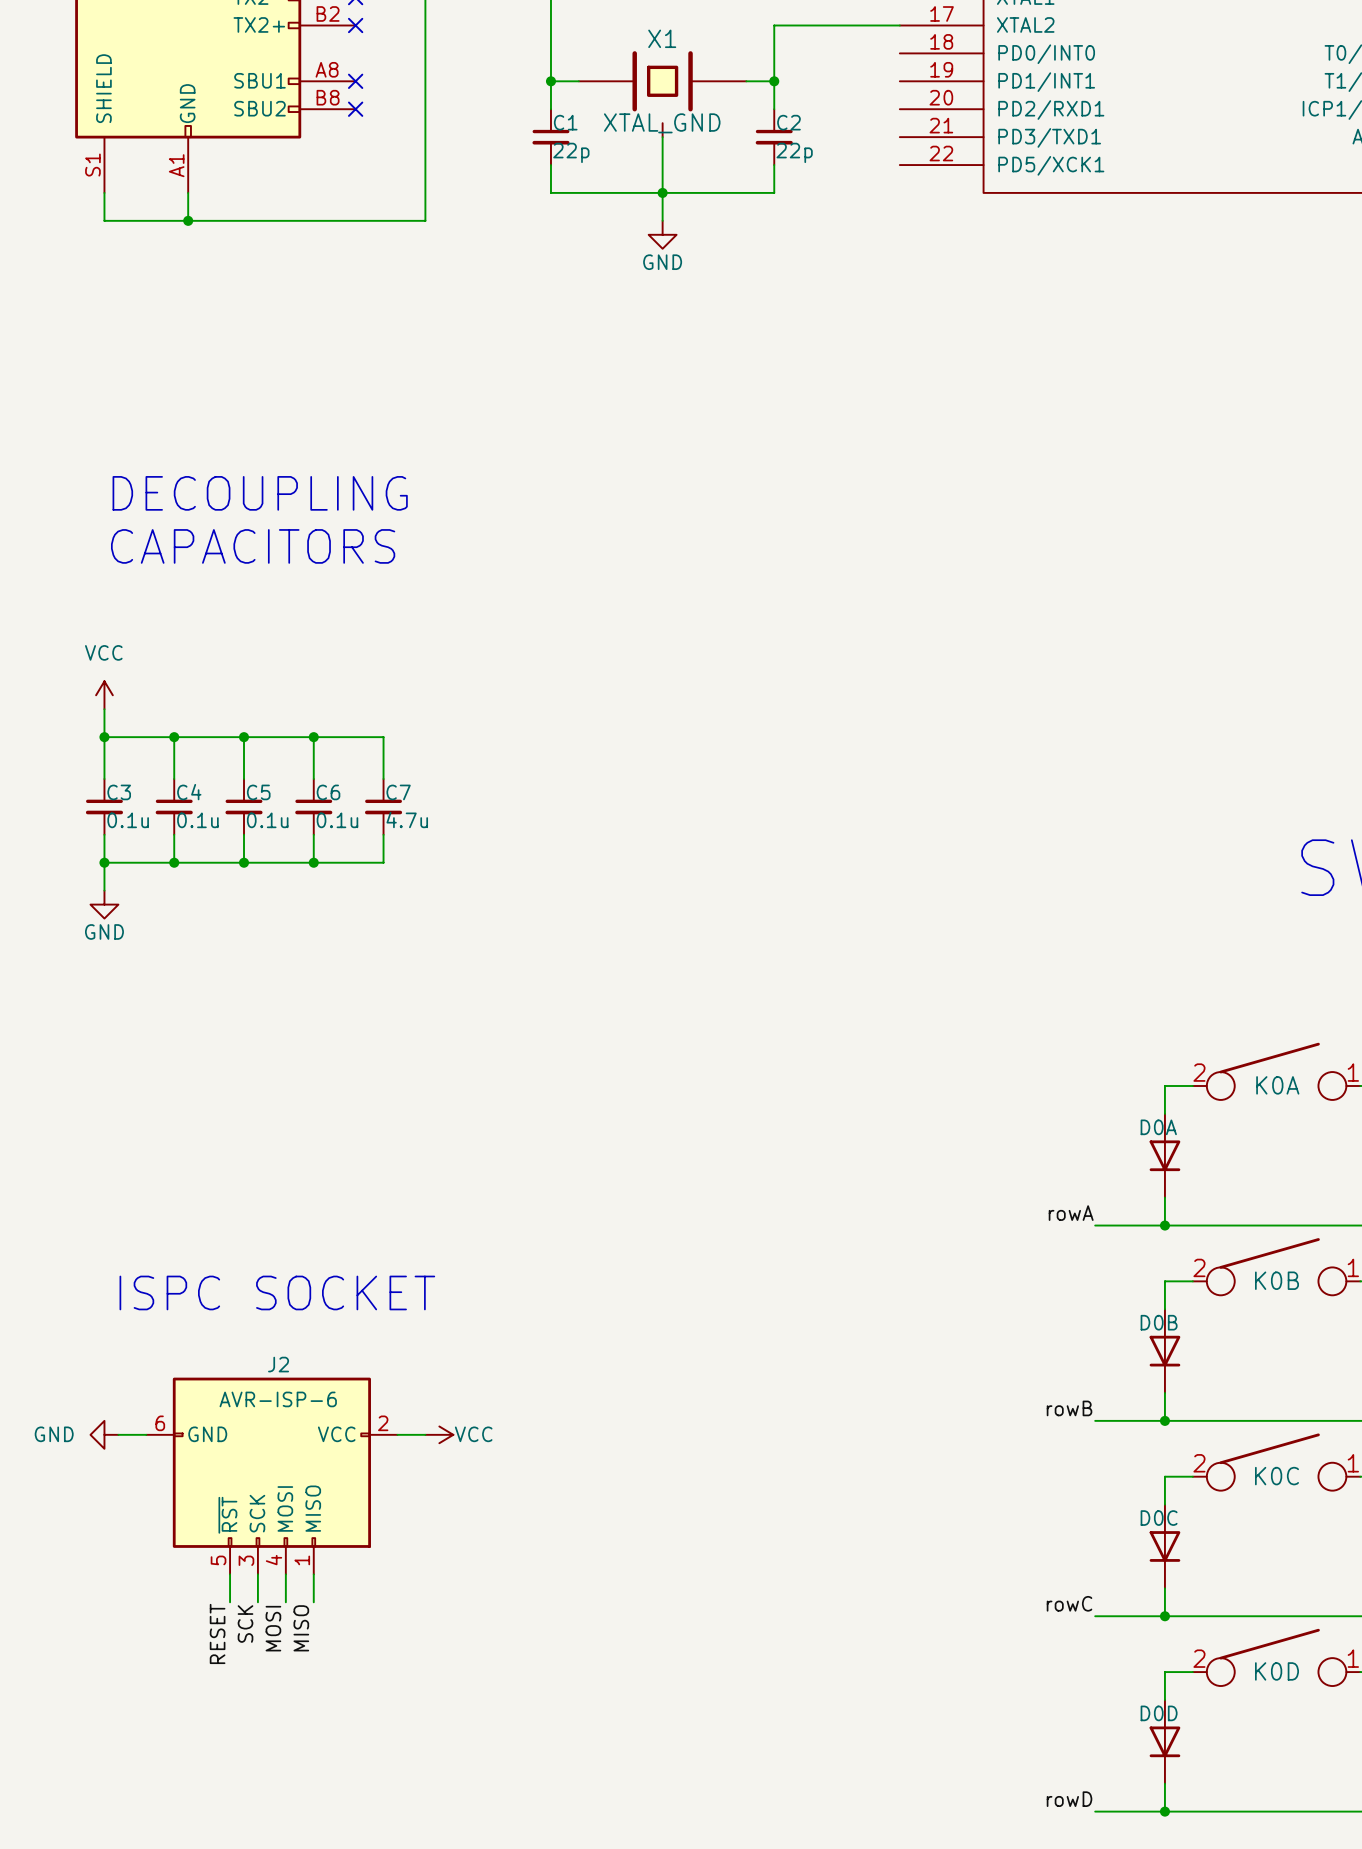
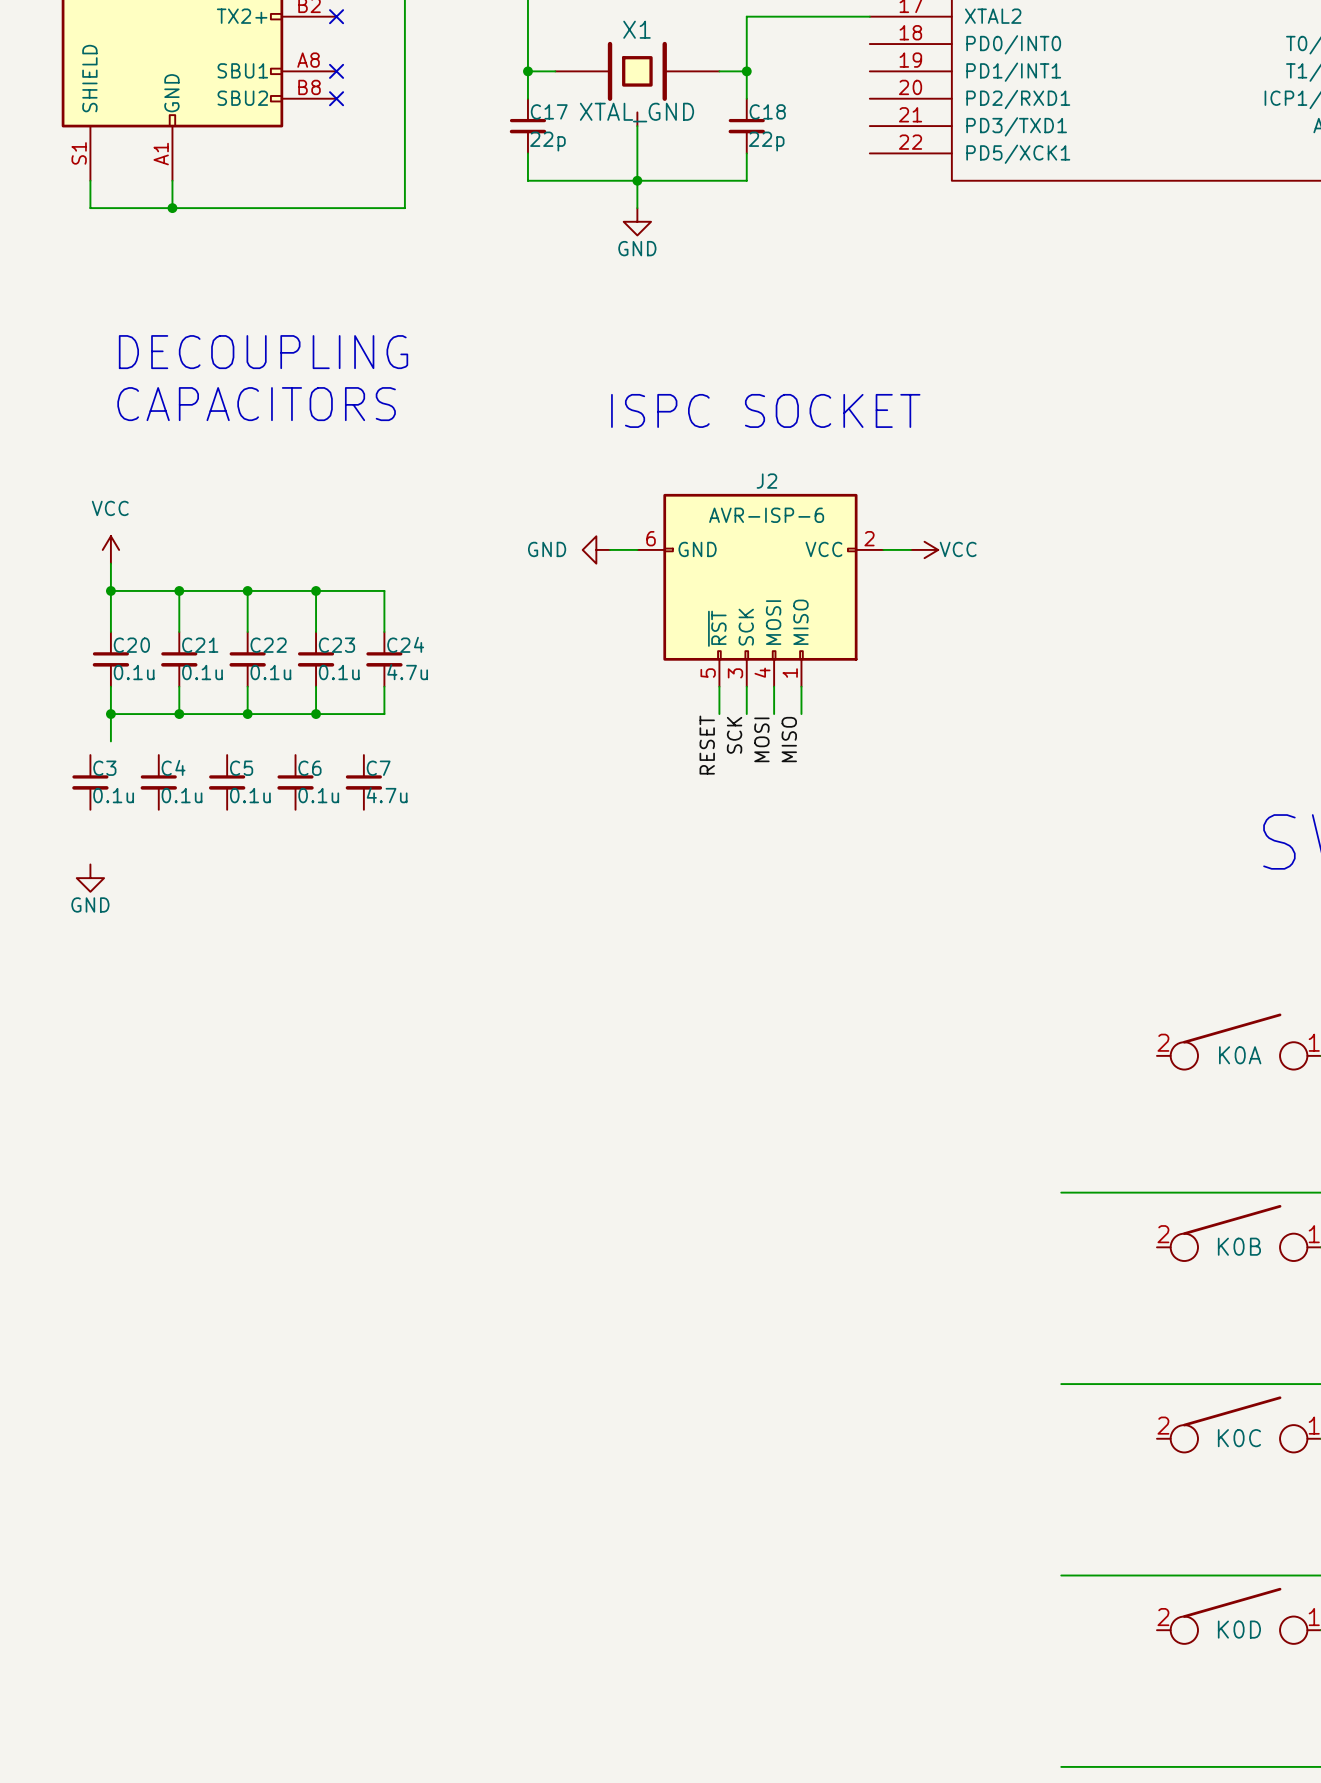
C1 name: C1 (565, 122) -> C17 (549, 111)
C2 name: C2 (788, 122) -> C18 (767, 111)
text: none -> ISPC SOCKET (765, 410)
text position: DECOUPLING (260, 493) -> DECOUPLING (263, 352)
text position: CAPACITORS (253, 546) -> CAPACITORS (256, 404)
power symbol: none -> GND (596, 549)
wire: none -> (610, 549) (637, 549)
wire: none -> (883, 549) (910, 549)
power symbol: none -> VCC (924, 549)
wire: none -> (110, 590) (384, 590) (384, 632)
junction: none -> (110, 590)
junction: none -> (179, 590)
junction: none -> (247, 590)
junction: none -> (316, 590)
C20: none -> 0.1u (110, 659)
C21: none -> 0.1u (179, 659)
C22: none -> 0.1u (247, 659)
C23: none -> 0.1u (316, 659)
C24: none -> 4.7u (384, 659)
power symbol position: VCC (104, 695) -> VCC (110, 549)
wire: (104, 709) (104, 779) -> (110, 563) (110, 632)
wire: none -> (719, 686) (719, 714)
wire: none -> (746, 686) (746, 714)
wire: none -> (774, 686) (774, 714)
wire: none -> (801, 686) (801, 714)
wire: (104, 737) (125, 737) -> none
junction position: (104, 737) -> (110, 714)
wire: (174, 737) (174, 779) -> (179, 590) (179, 632)
junction position: (174, 737) -> (179, 714)
wire: (244, 737) (244, 779) -> (247, 590) (247, 632)
junction position: (244, 737) -> (247, 714)
wire: (313, 737) (313, 779) -> (316, 590) (316, 632)
junction position: (313, 737) -> (316, 714)
wire: (383, 737) (383, 779) -> (363, 714) (384, 714) (384, 686)
label: none -> SCK (734, 735)
label: none -> MOSI (761, 739)
label: none -> MISO (789, 739)
label: none -> RESET (707, 745)
wire: (104, 834) (104, 890) -> (110, 686) (110, 741)
wire: (174, 834) (174, 862) -> (179, 686) (179, 714)
wire: (244, 834) (244, 862) -> (247, 686) (247, 714)
wire: (313, 834) (313, 862) -> (316, 686) (316, 714)
wire: (383, 834) (383, 862) (104, 862) -> none
junction: (104, 862) -> none
junction: (174, 862) -> none
junction: (244, 862) -> none
junction: (313, 862) -> none
wire: (1192, 1085) (1164, 1085) (1164, 1113) -> none
D0A: (1164, 1155) -> none
wire: (1164, 1197) (1164, 1225) -> none
label: rowA (1071, 1213) -> none
junction: (1164, 1225) -> none
wire: (1192, 1281) (1164, 1281) (1164, 1309) -> none
text: ISPC SOCKET (277, 1292) -> none
D0B: (1164, 1351) -> none
wire: (1164, 1392) (1164, 1420) -> none
label: rowB (1069, 1408) -> none
junction: (1164, 1420) -> none
power symbol: GND (104, 1434) -> none
wire: (118, 1434) (146, 1434) -> none
wire: (397, 1434) (425, 1434) -> none
power symbol: VCC (439, 1434) -> none
J2 position: (271, 1476) -> (760, 590)
wire: (1192, 1476) (1164, 1476) (1164, 1504) -> none
D0C: (1164, 1546) -> none
wire: (230, 1574) (230, 1602) -> none
wire: (257, 1574) (257, 1602) -> none
wire: (285, 1574) (285, 1602) -> none
wire: (313, 1574) (313, 1602) -> none
wire: (1164, 1588) (1164, 1616) -> none
label: rowC (1069, 1603) -> none
junction: (1164, 1616) -> none
label: SCK (245, 1623) -> none
label: MOSI (273, 1628) -> none
label: MISO (301, 1628) -> none
label: RESET (217, 1633) -> none
wire: (1192, 1672) (1164, 1672) (1164, 1699) -> none
D0D: (1164, 1741) -> none
wire: (1164, 1783) (1164, 1811) -> none
label: rowD (1069, 1799) -> none
junction: (1164, 1811) -> none

